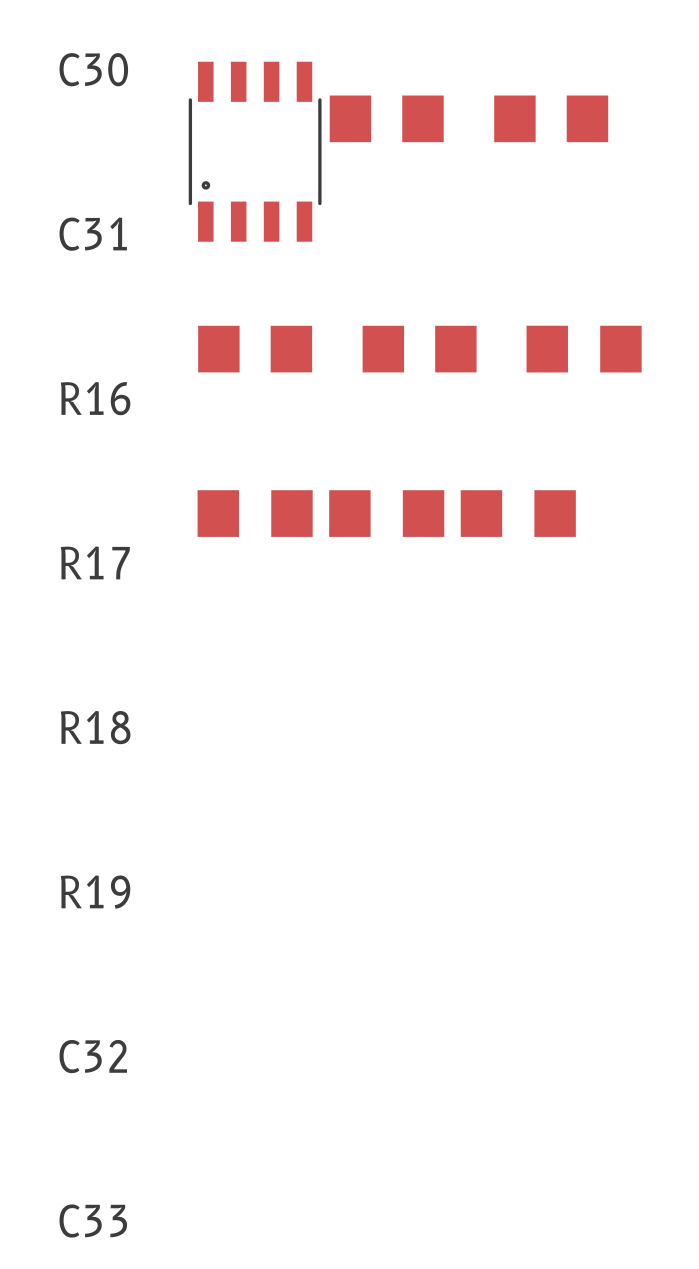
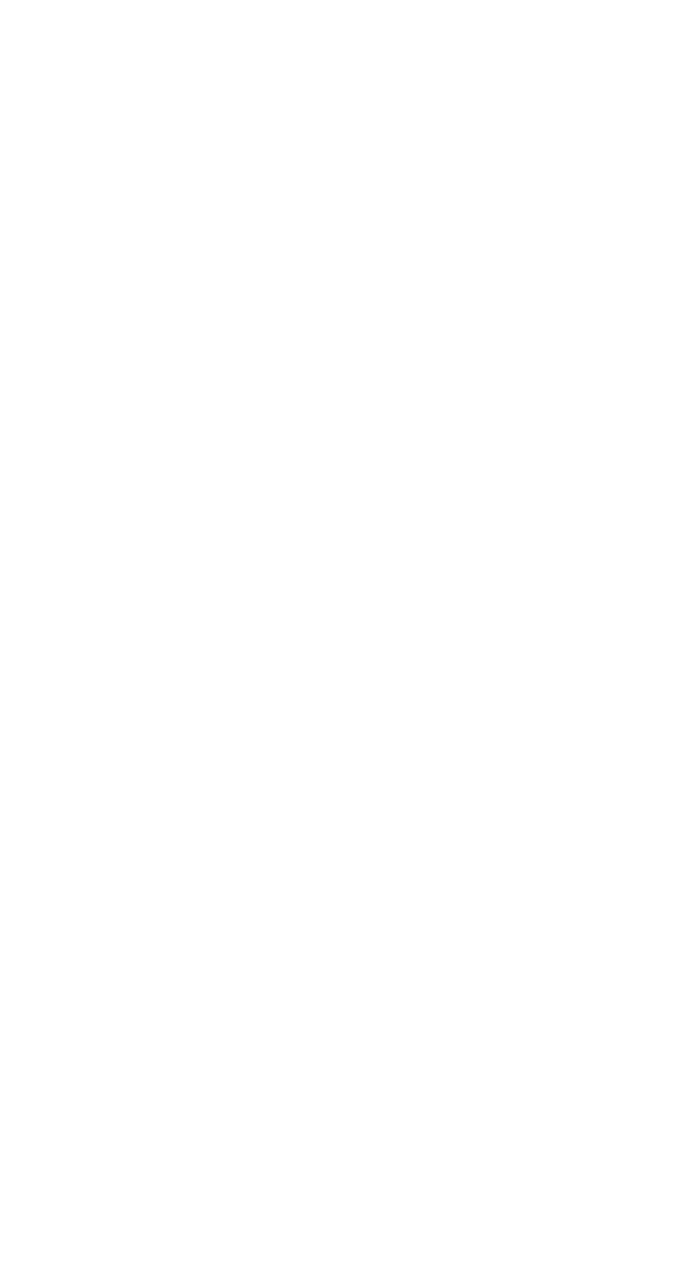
C32: (386, 118) -> none
C33: (551, 118) -> none
part: (255, 151) -> none
C30: (255, 349) -> none
C31: (419, 349) -> none
R16: (584, 349) -> none
R17: (255, 513) -> none
R18: (386, 513) -> none
R19: (518, 513) -> none

